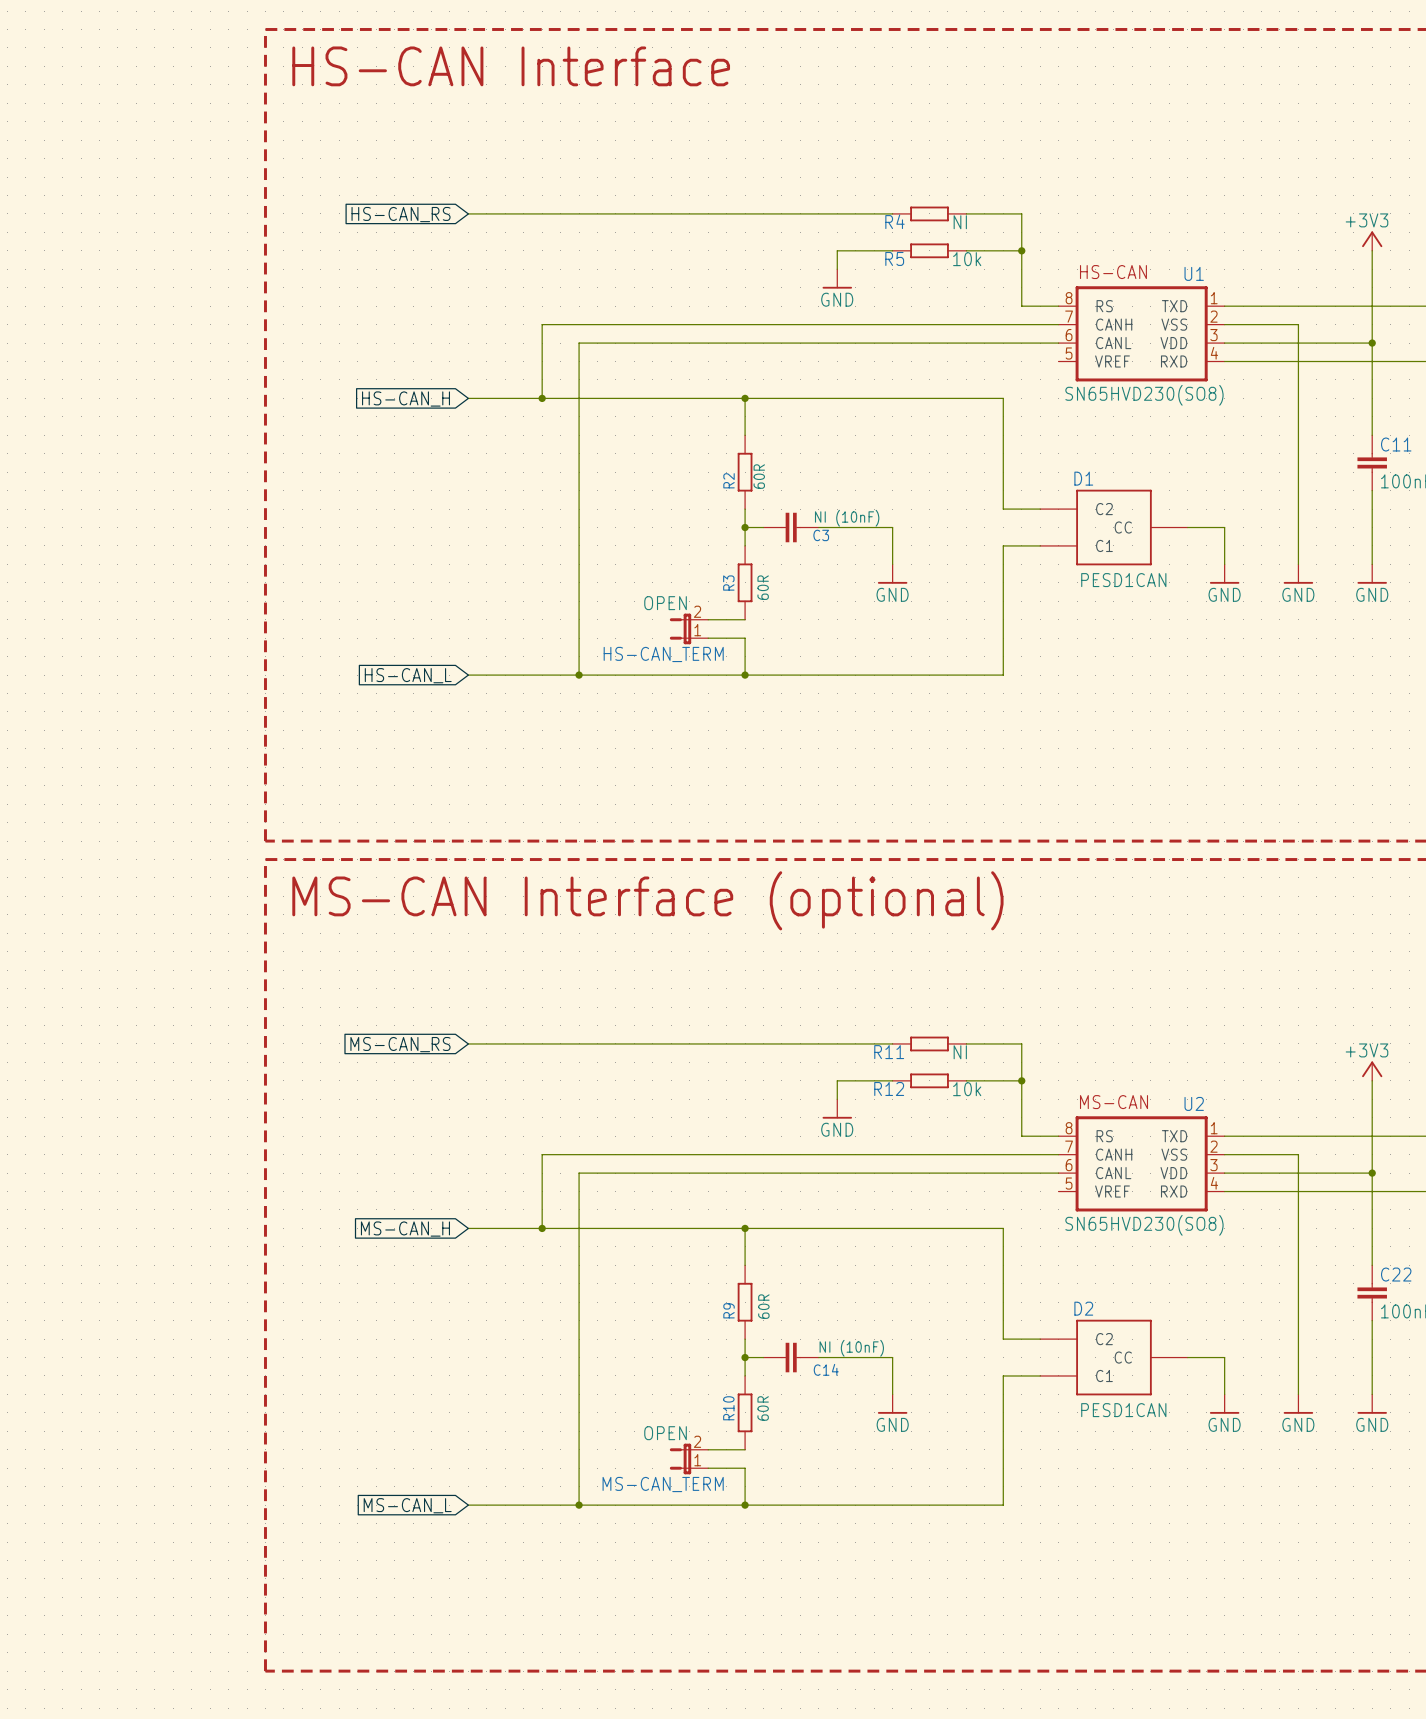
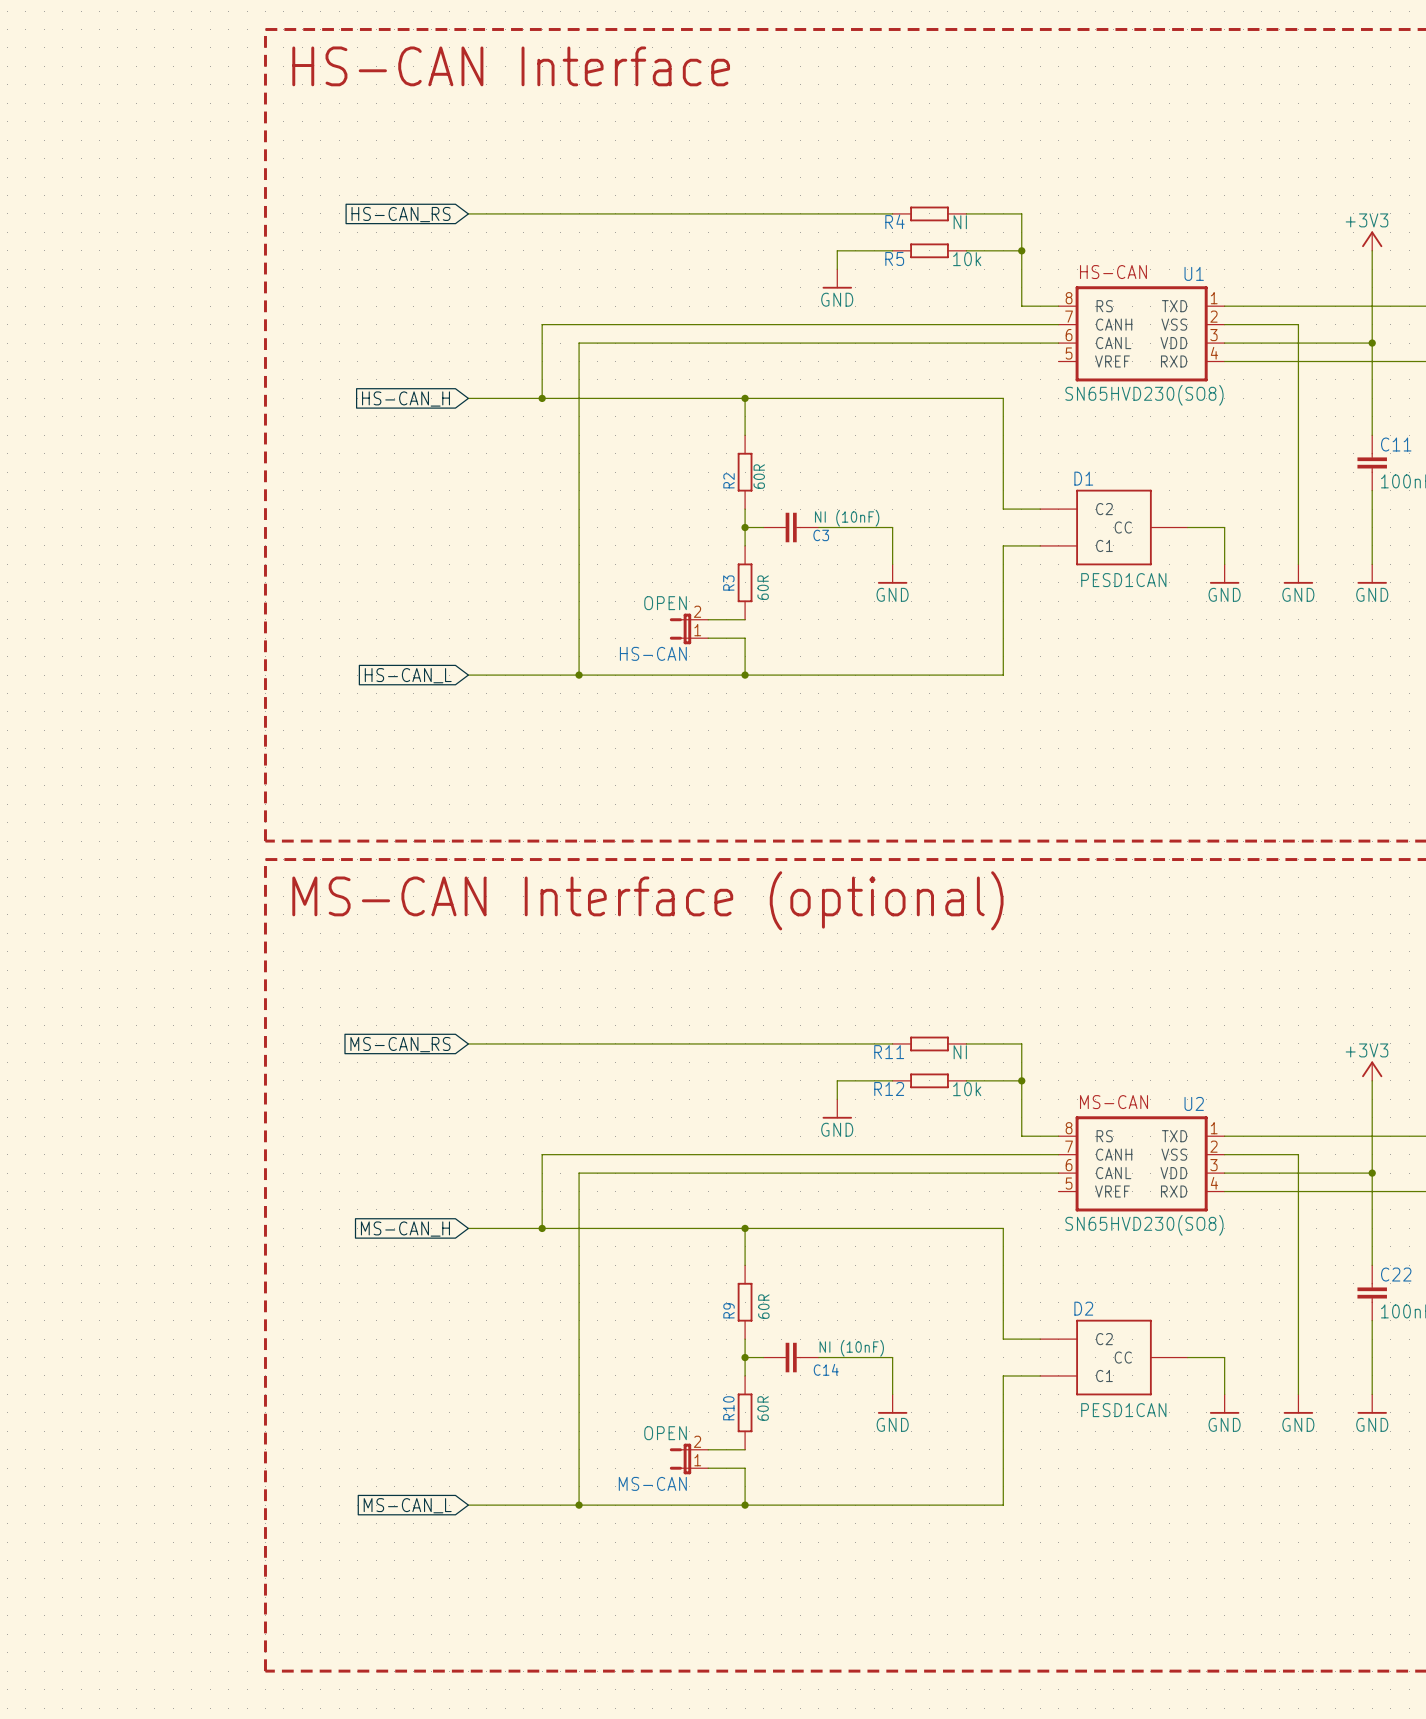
HS-CAN_TERM name: HS-CAN_TERM (663, 654) -> HS-CAN (653, 653)
MS-CAN_TERM name: MS-CAN_TERM (663, 1484) -> MS-CAN (652, 1483)

